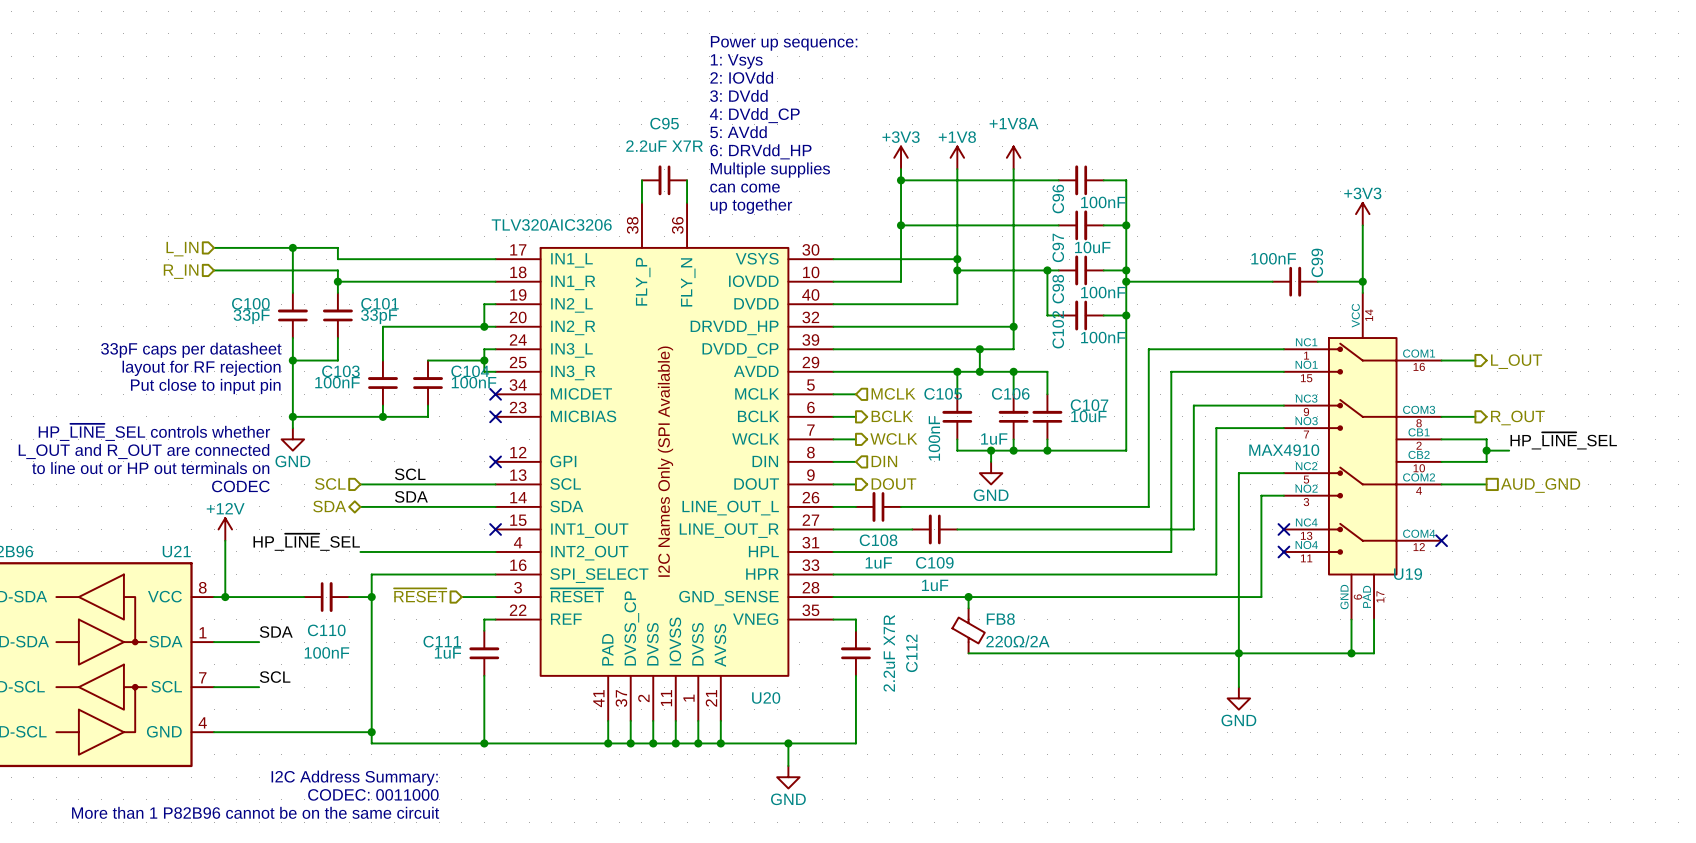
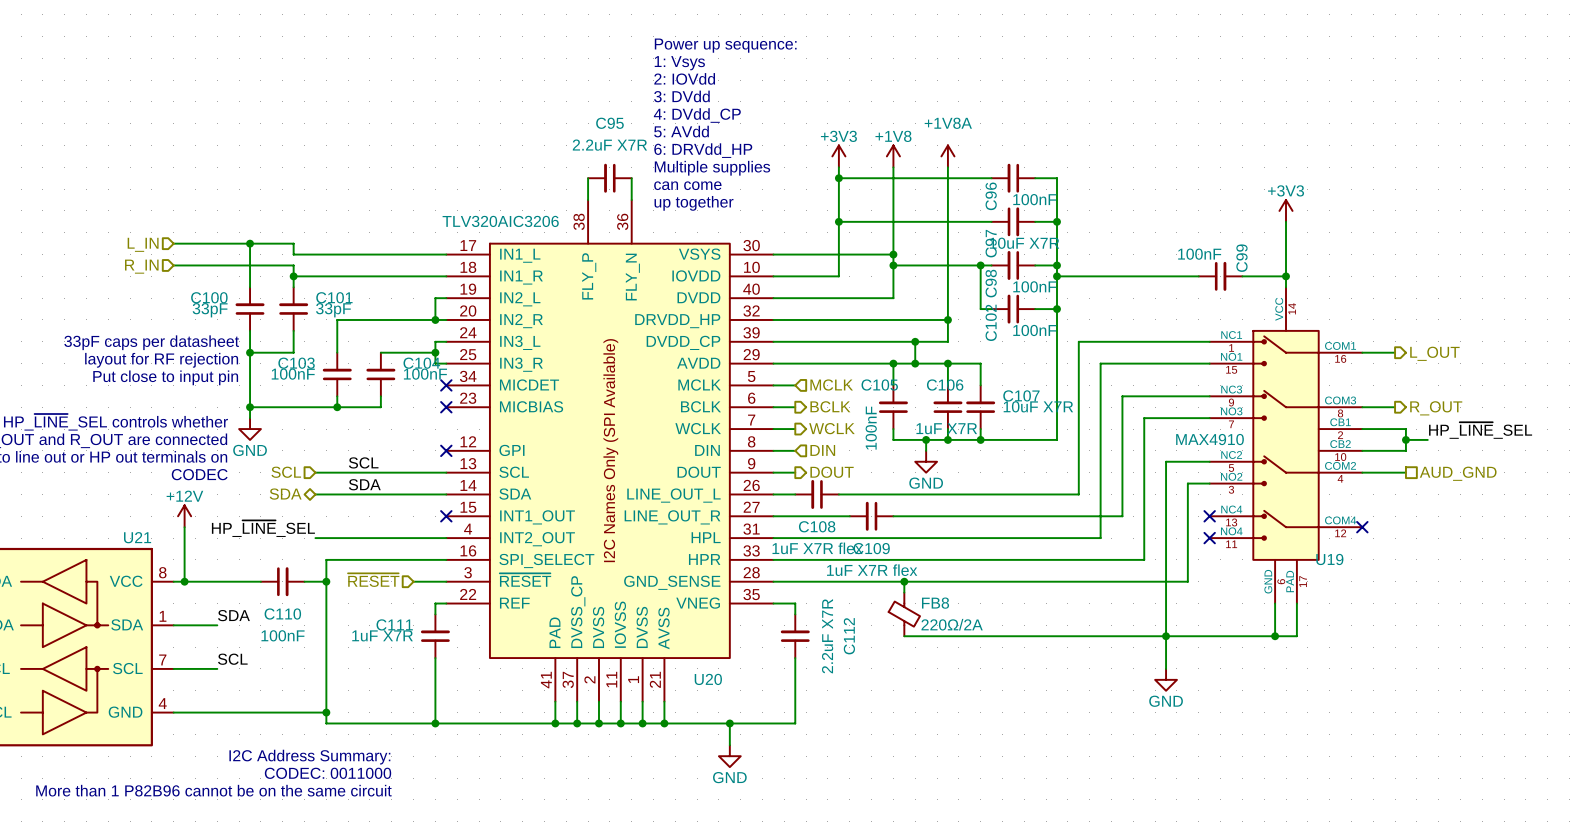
C97 value: 10uF (1092, 247) -> 10uF X7R (1024, 243)
C107 value: 10uF (1088, 416) -> 10uF X7R (1038, 406)
C106 value: 1uF (994, 439) -> 1uF X7R (946, 428)
C108 value: 1uF (878, 562) -> 1uF X7R flex (817, 548)
C109 value: 1uF (935, 585) -> 1uF X7R flex (872, 570)
C111 value: 1uF (447, 653) -> 1uF X7R (382, 635)

